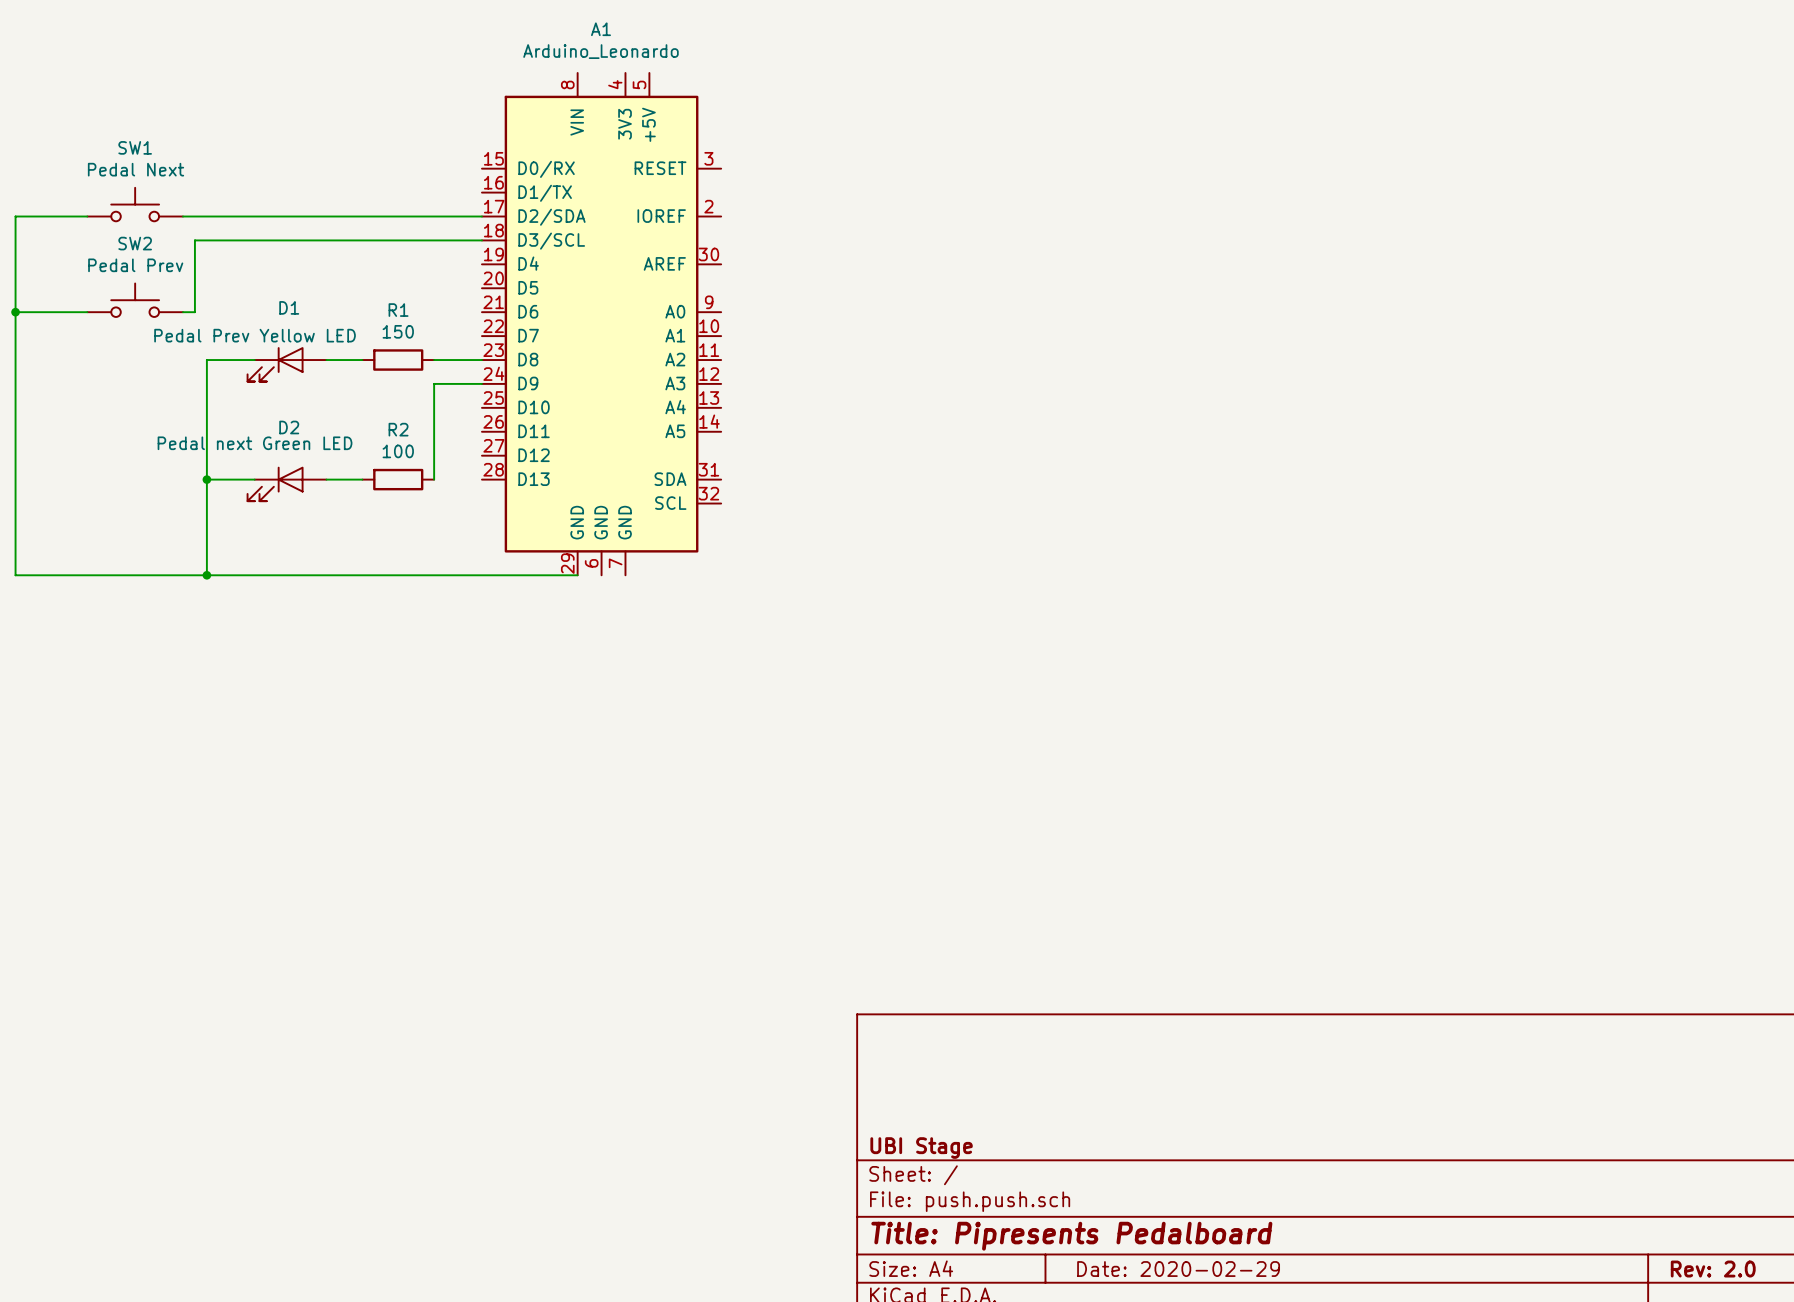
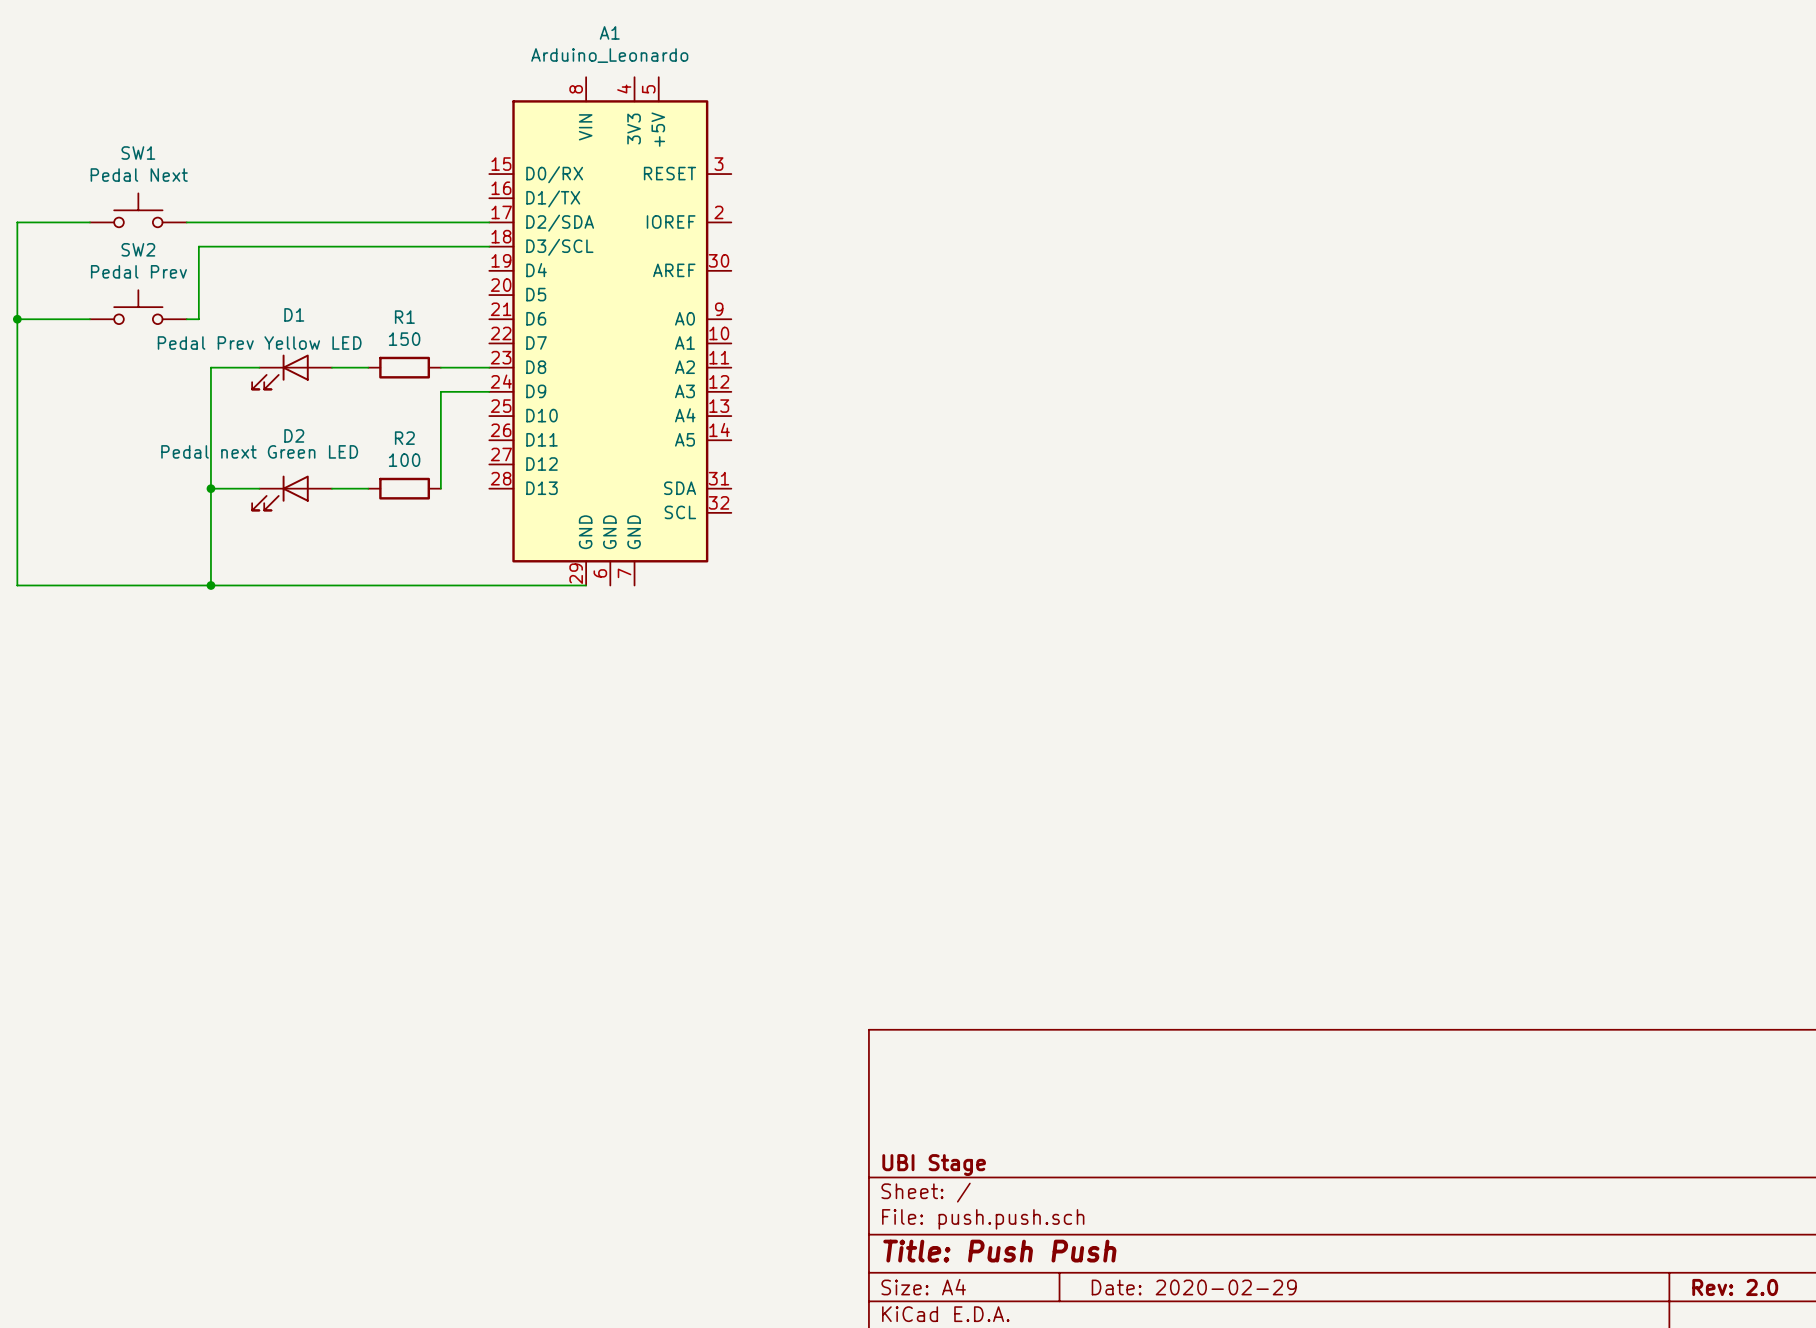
title block: Title: Pipresents Pedalboard (1071, 1236) -> Title: Push Push (999, 1251)

